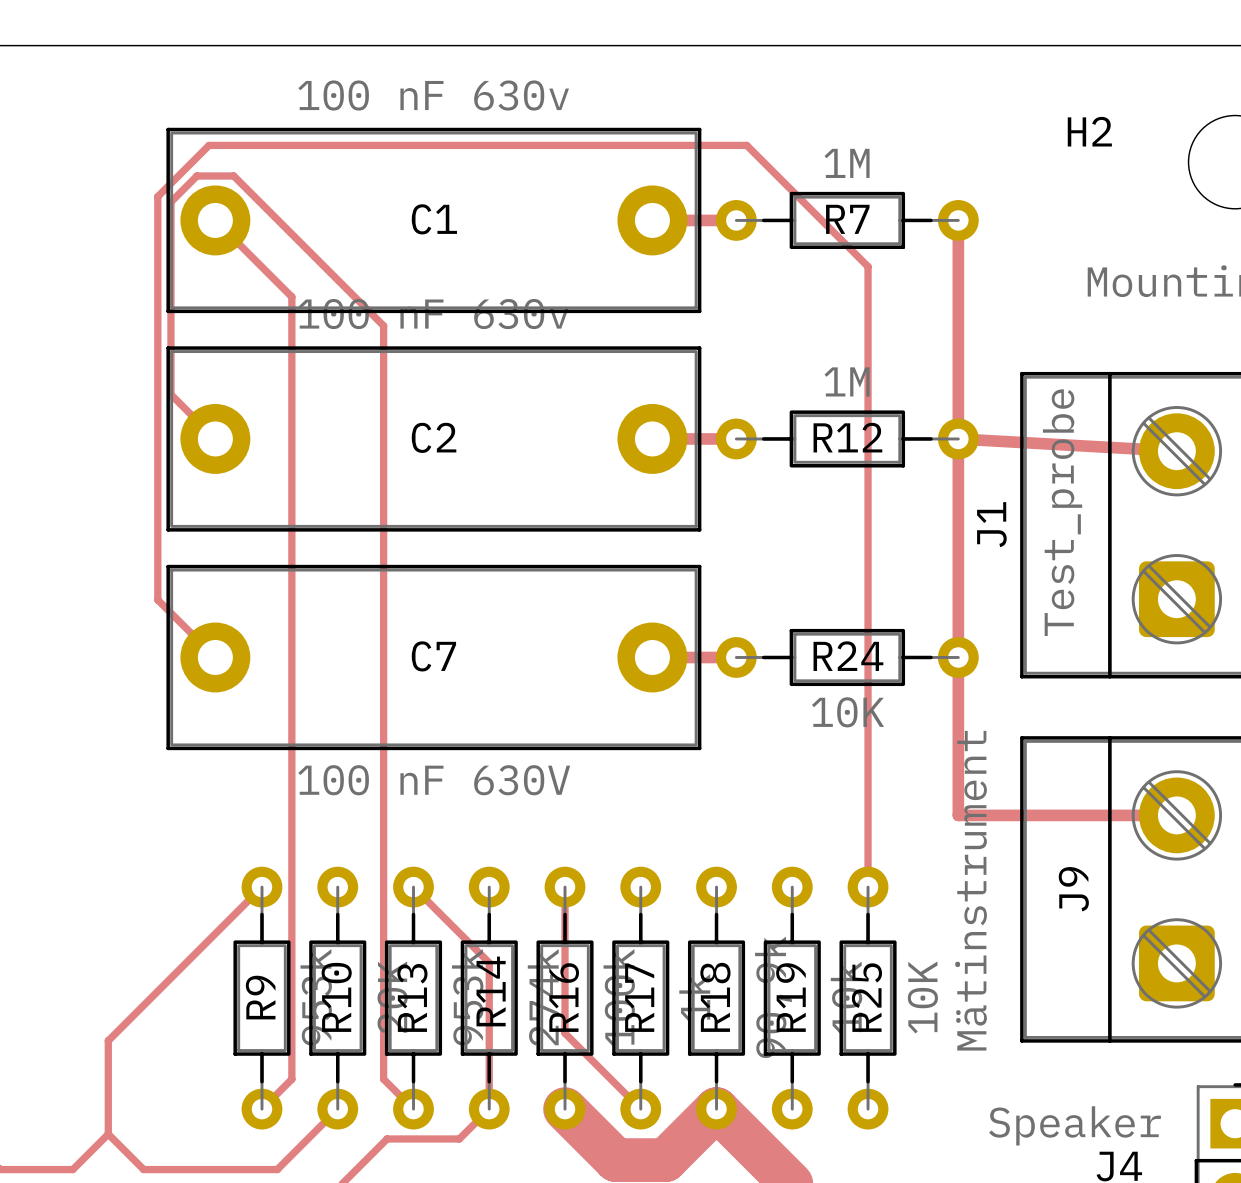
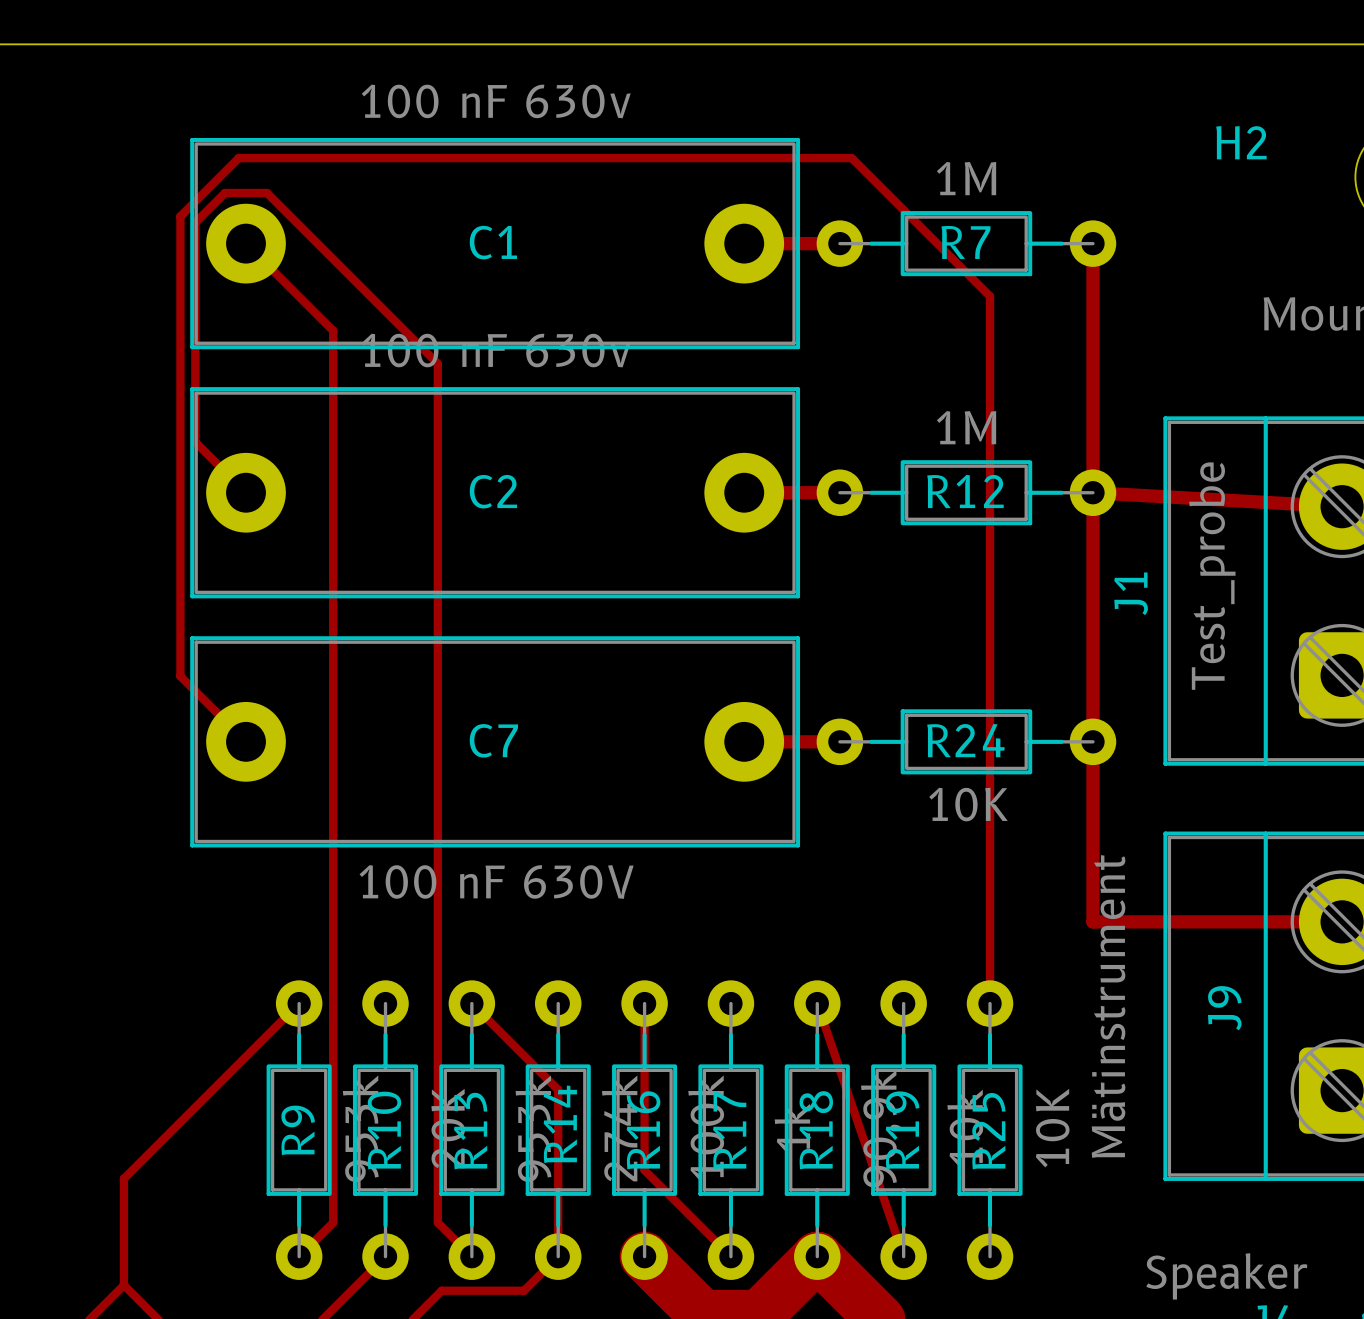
track: none -> (817, 1003) (903, 1256)

